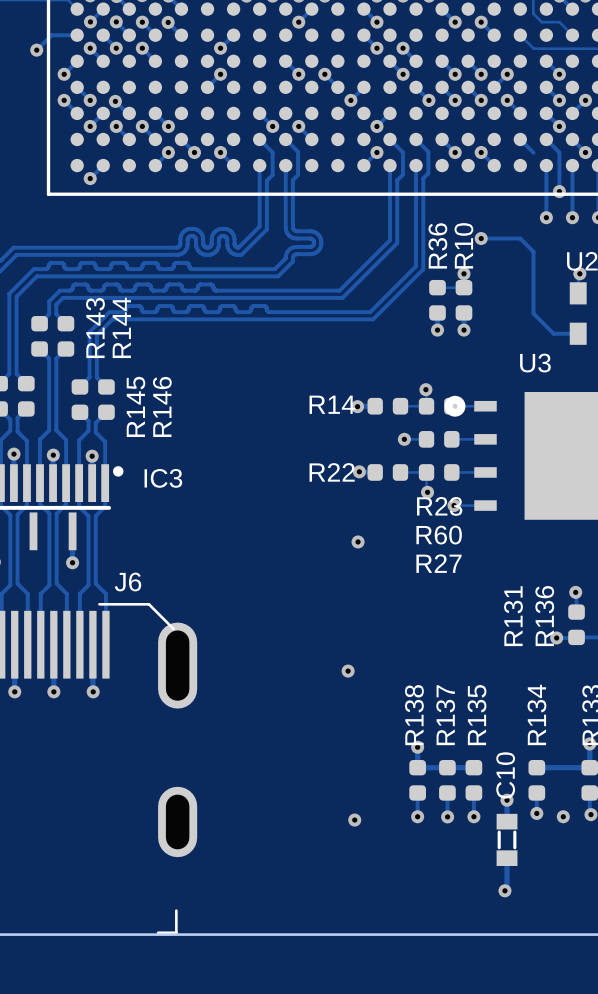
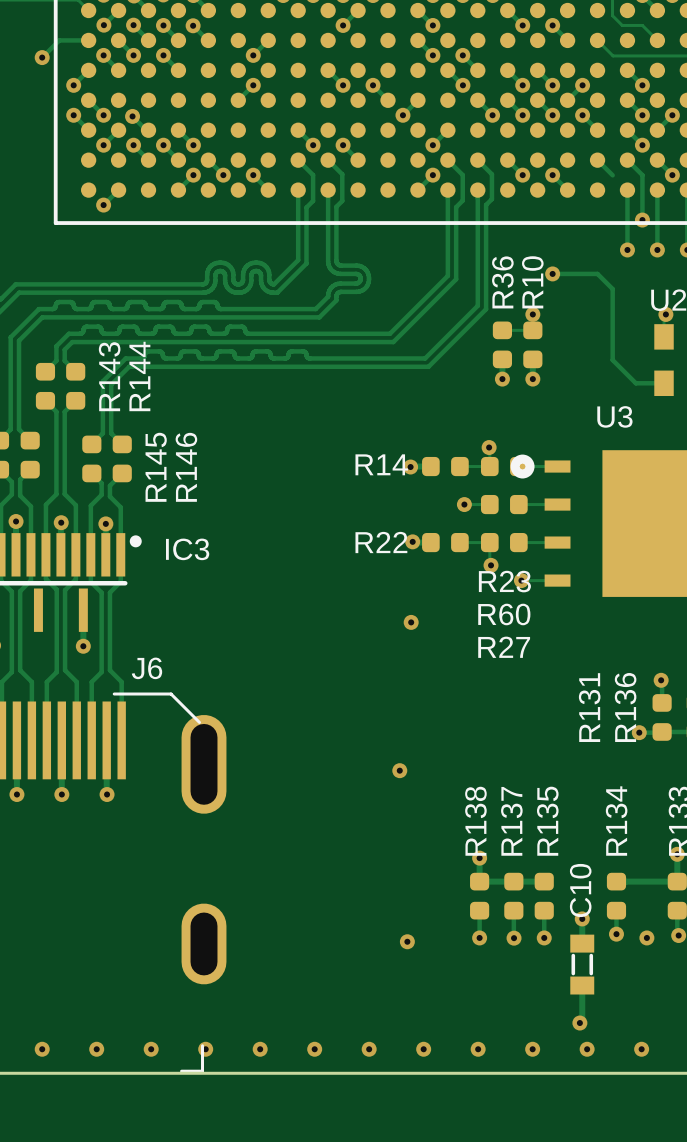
via: none -> (42, 1049)
via: none -> (96, 1049)
via: none -> (151, 1049)
via: none -> (205, 1049)
via: none -> (260, 1049)
via: none -> (314, 1049)
via: none -> (369, 1049)
via: none -> (423, 1049)
via: none -> (478, 1049)
via: none -> (532, 1049)
via: none -> (587, 1049)
via: none -> (641, 1049)

